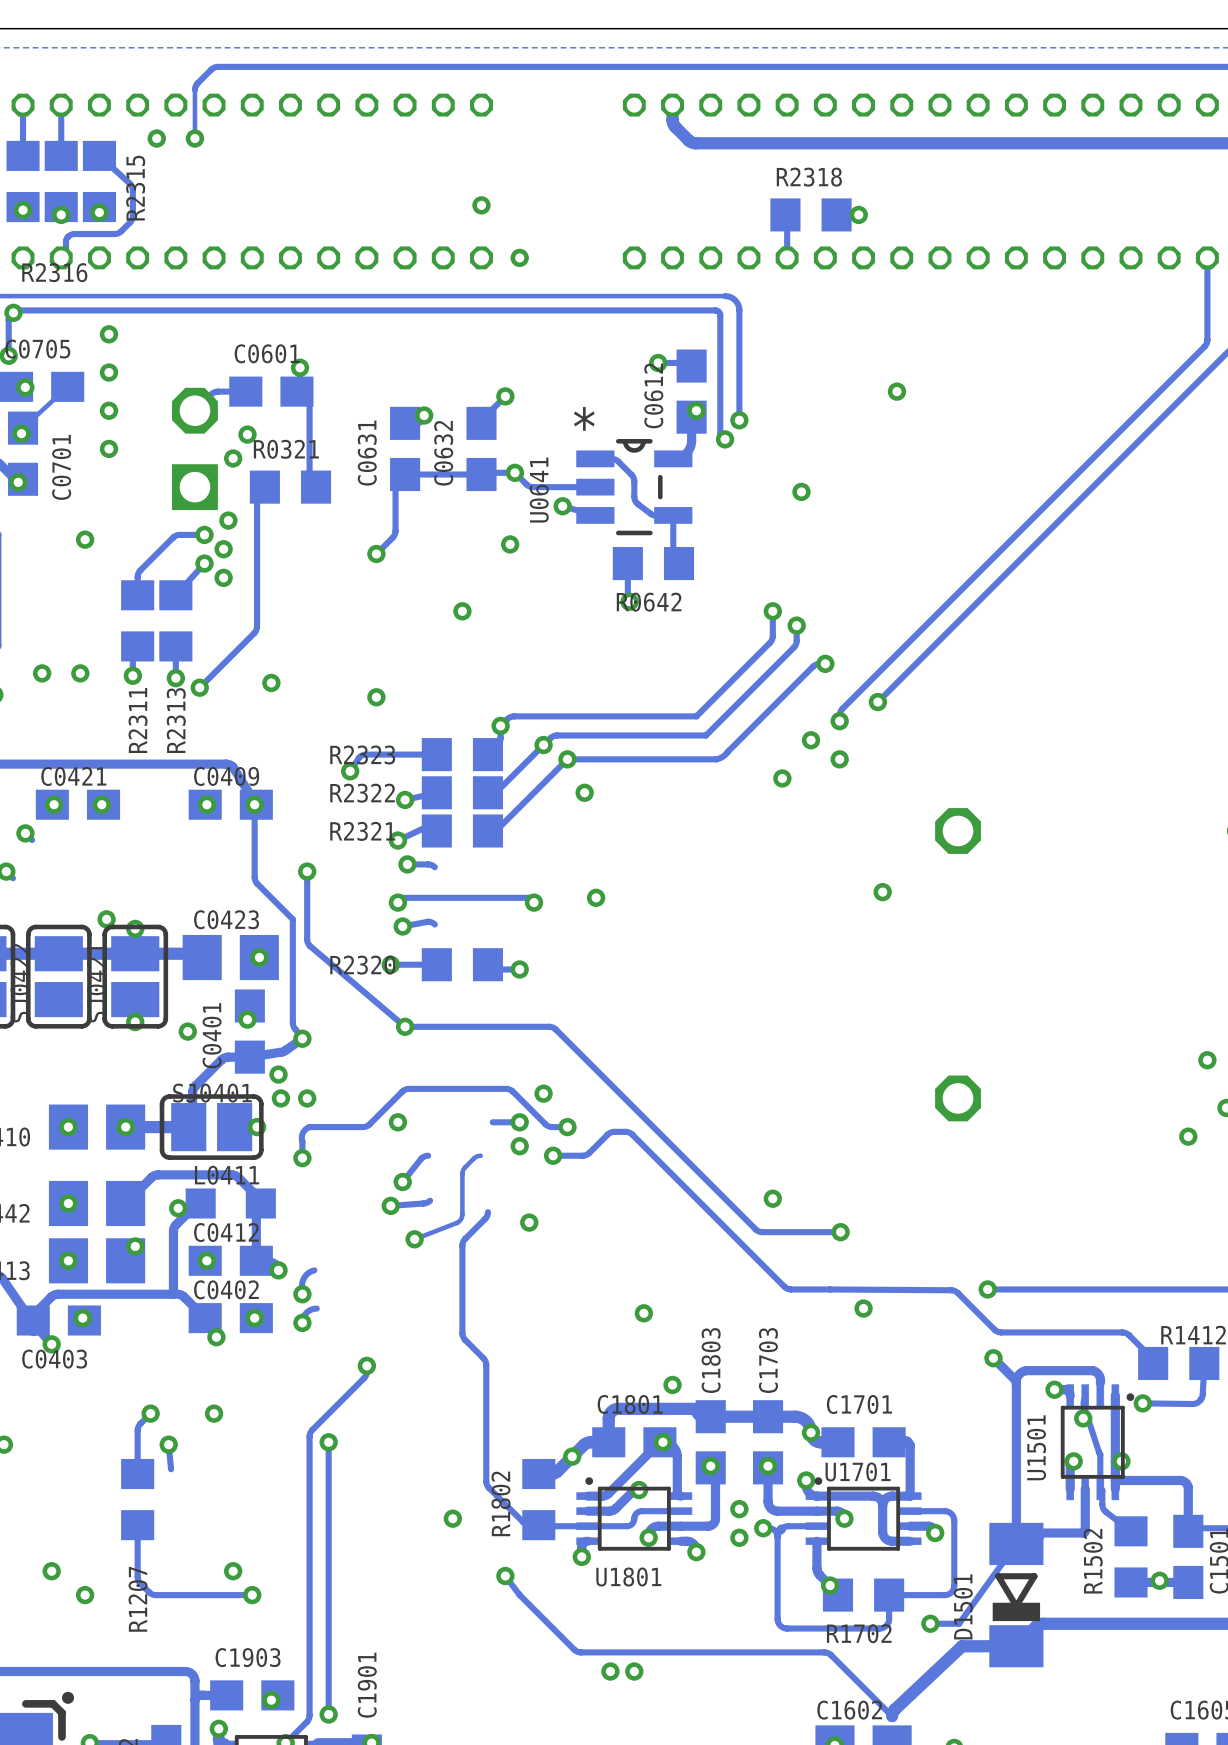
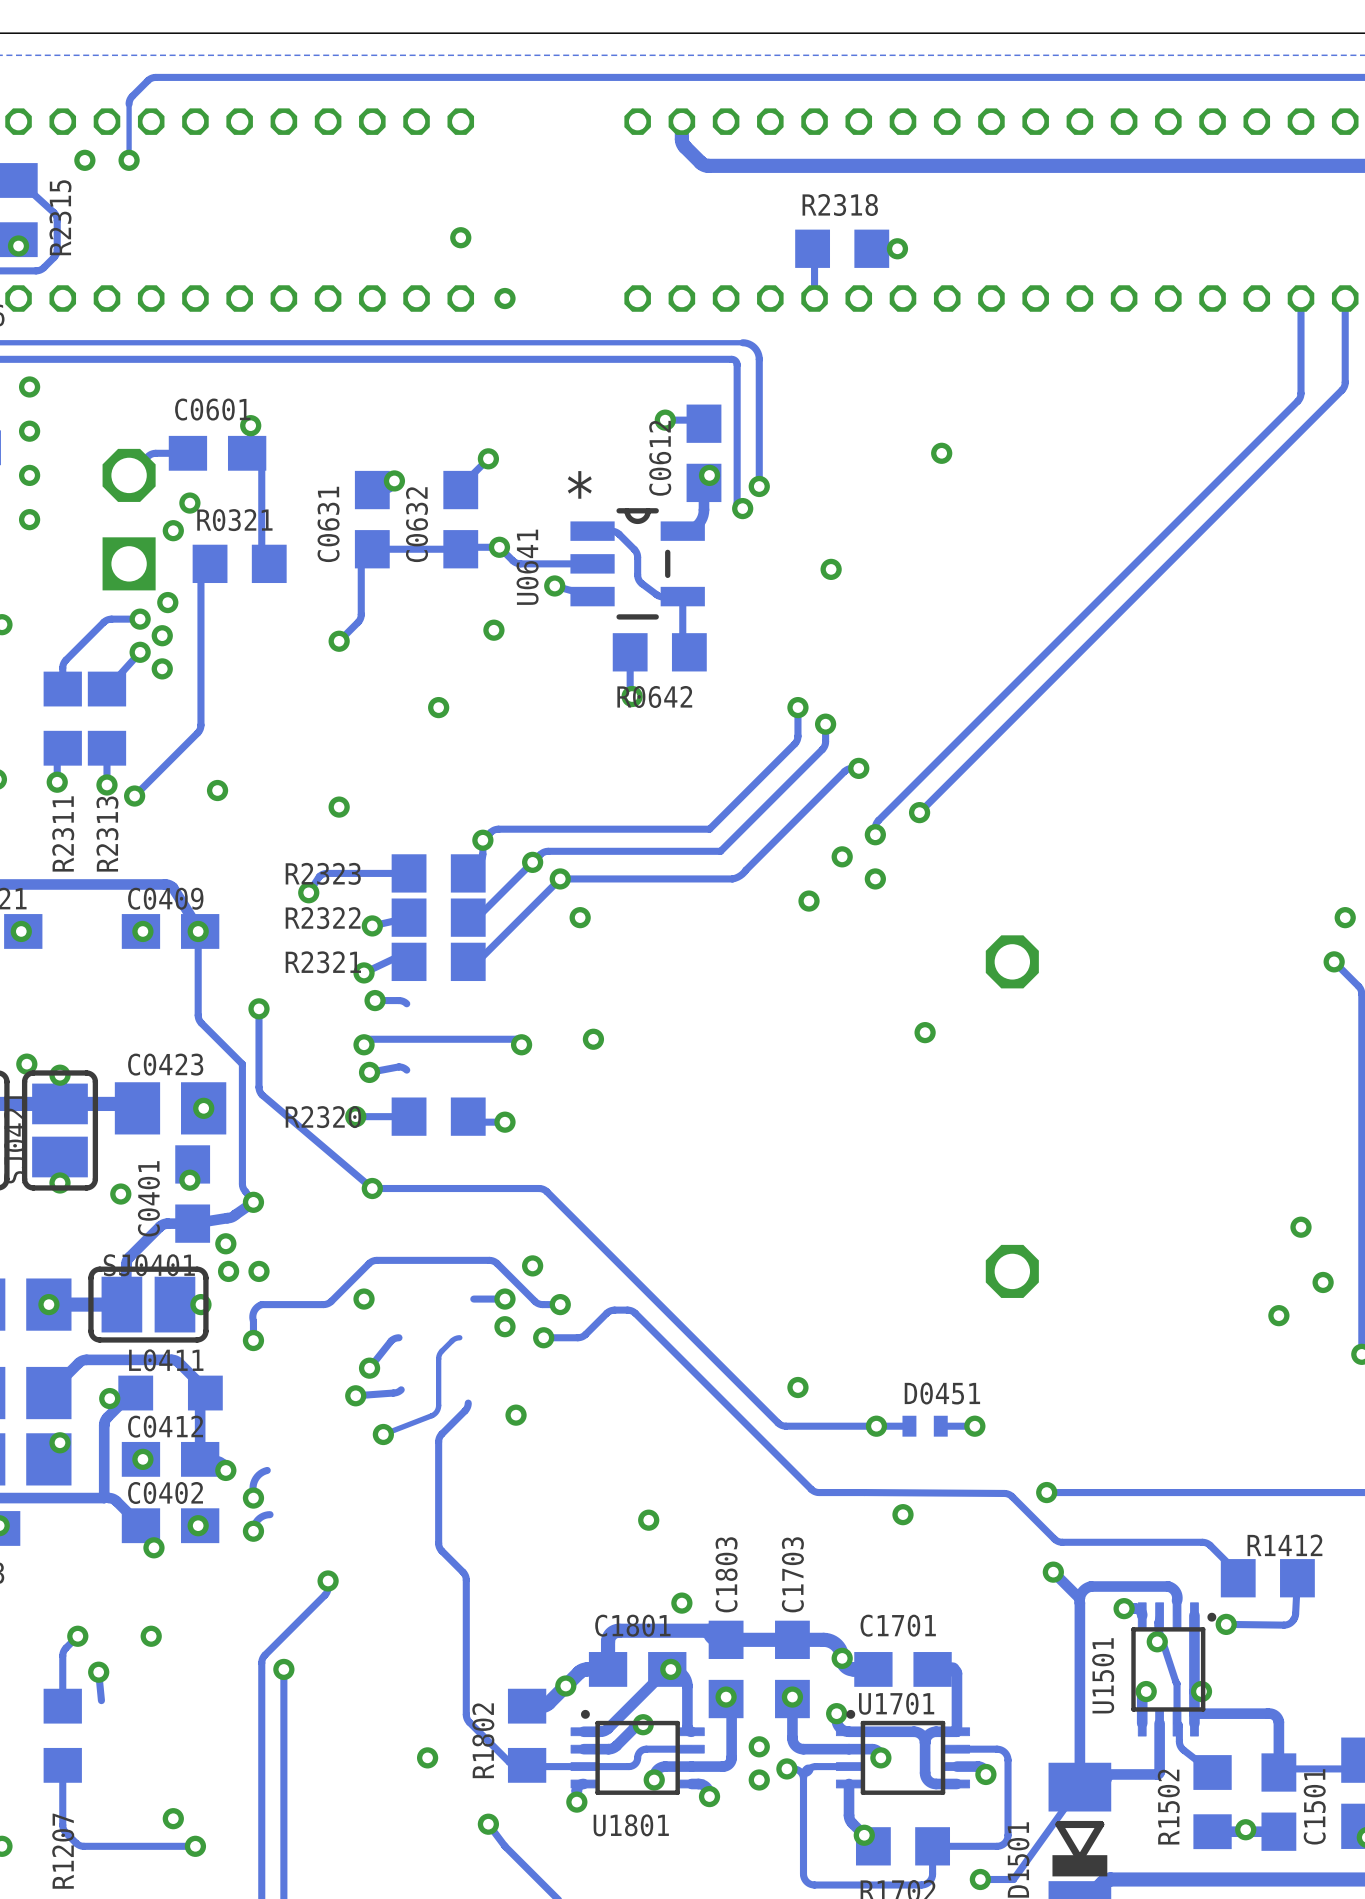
track: none -> (909, 1426) (876, 1426)
D0451: none -> (925, 1426)
track: none -> (974, 1426) (940, 1426)
via: none -> (974, 1426)

